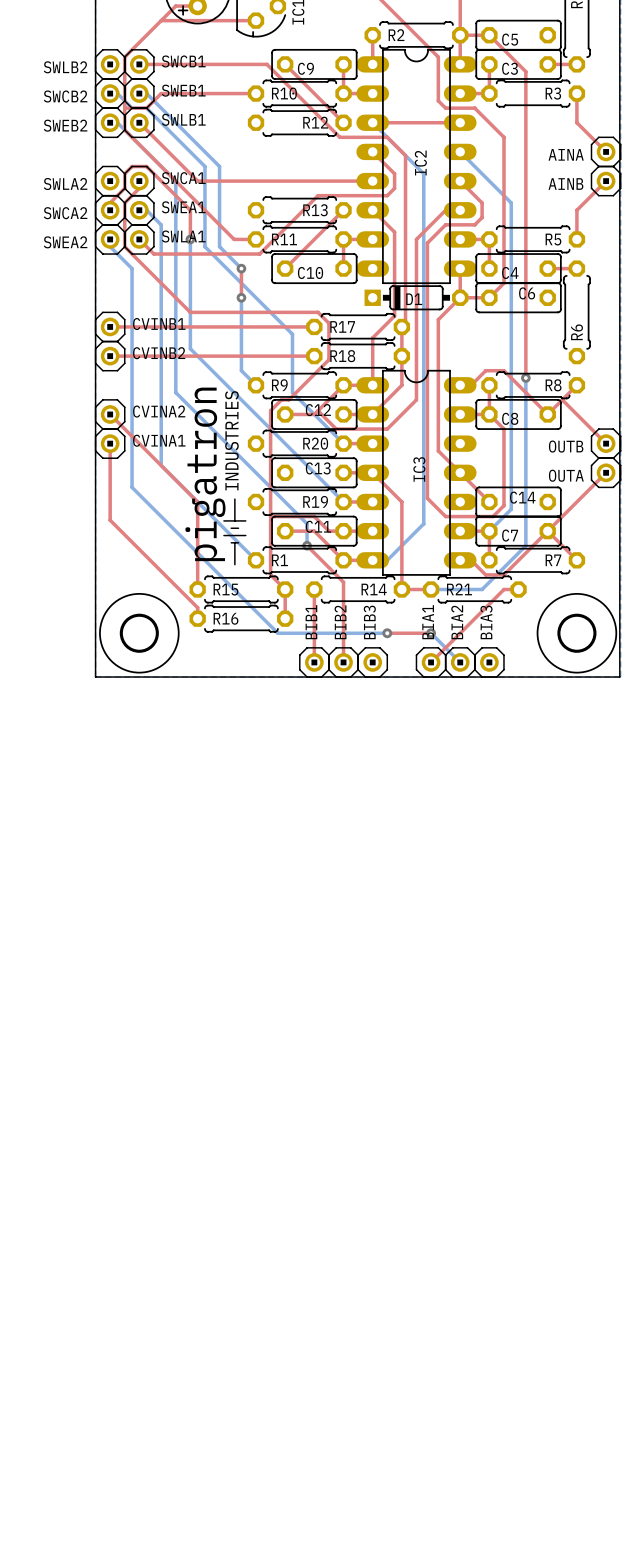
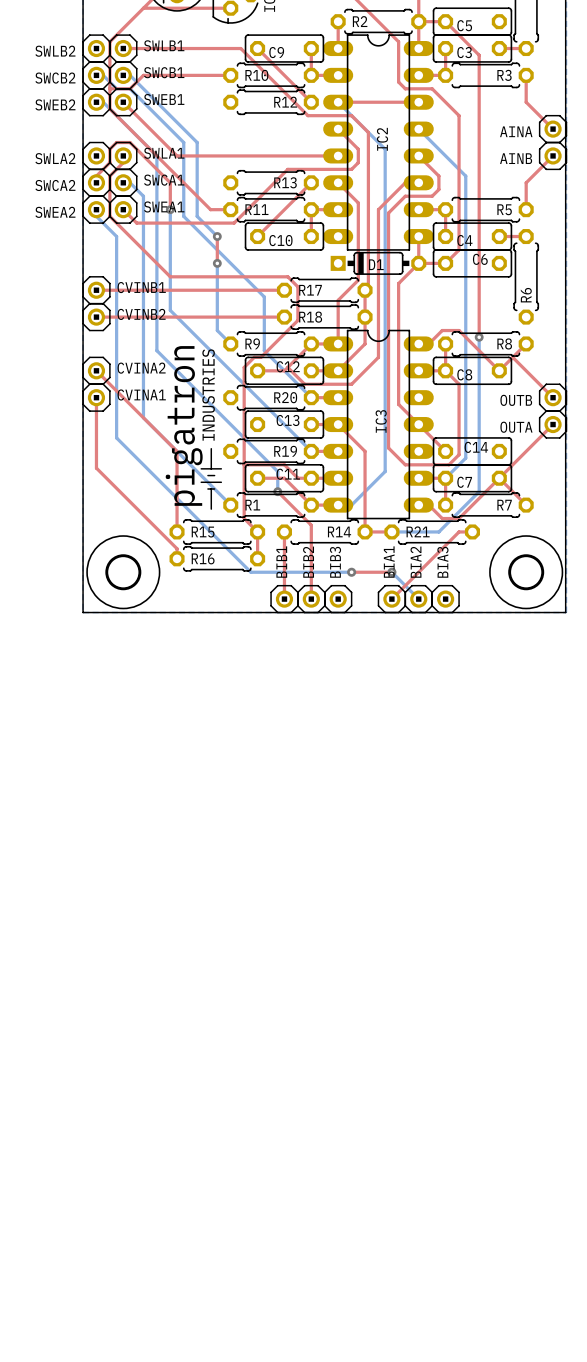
SWCB1 name: SWCB1 (183, 61) -> SWLB1 (164, 45)
SWEB1 name: SWEB1 (183, 90) -> SWCB1 (164, 72)
SWLB1 name: SWLB1 (183, 119) -> SWEB1 (164, 99)
SWCA1 name: SWCA1 (183, 178) -> SWLA1 (164, 153)
SWEA1 name: SWEA1 (183, 207) -> SWCA1 (164, 180)
SWLA1 name: SWLA1 (183, 236) -> SWEA1 (164, 206)

